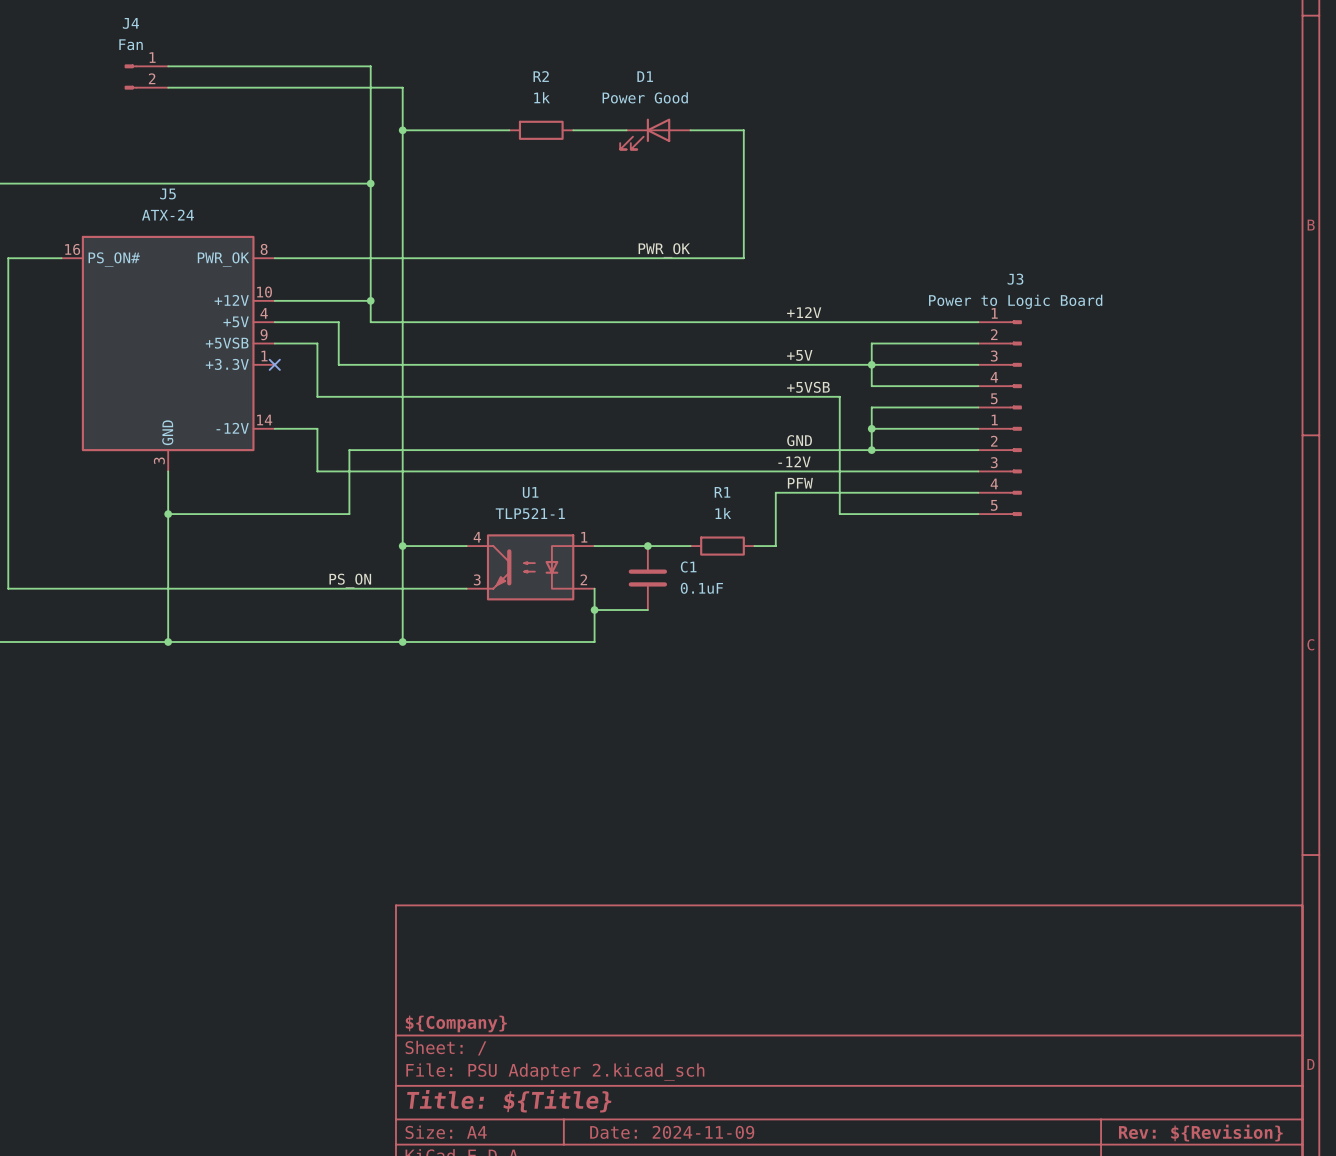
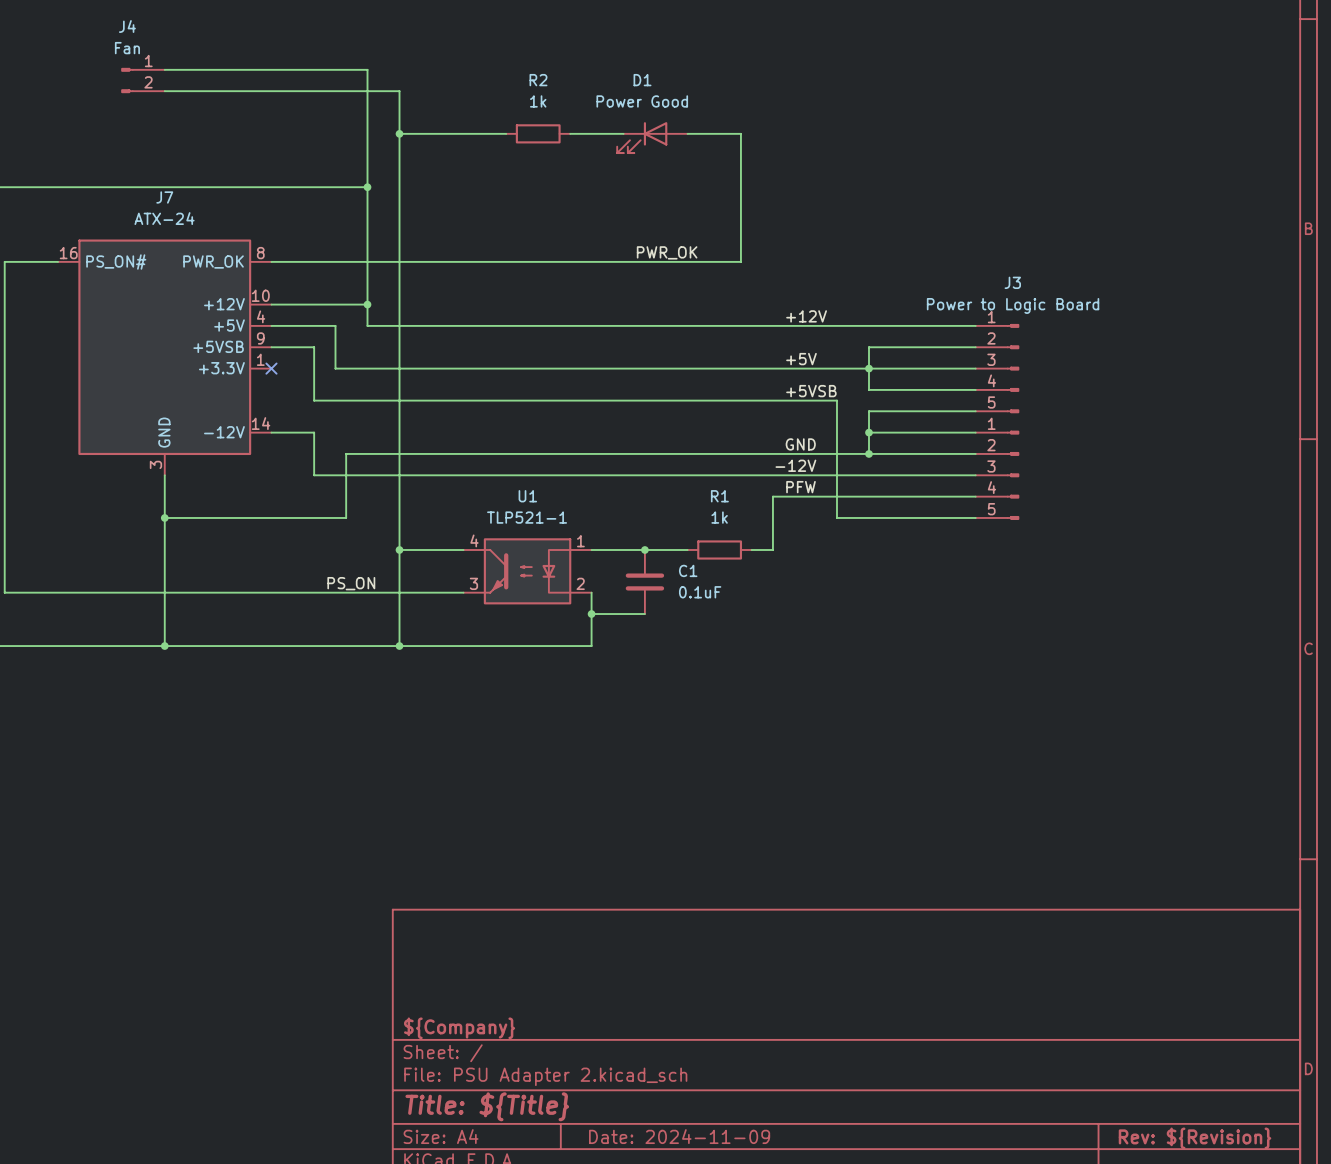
J5 name: J5 (167, 193) -> J7 (164, 197)

